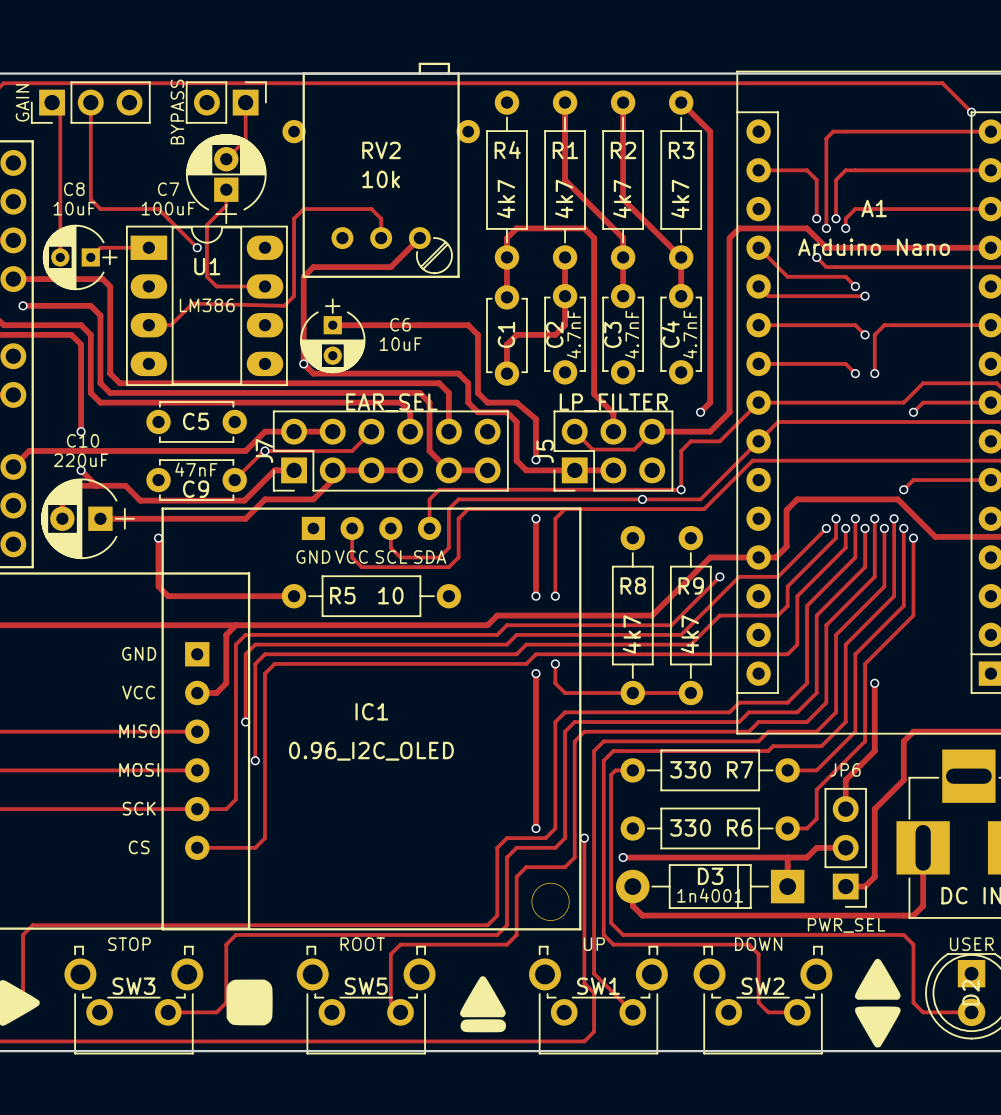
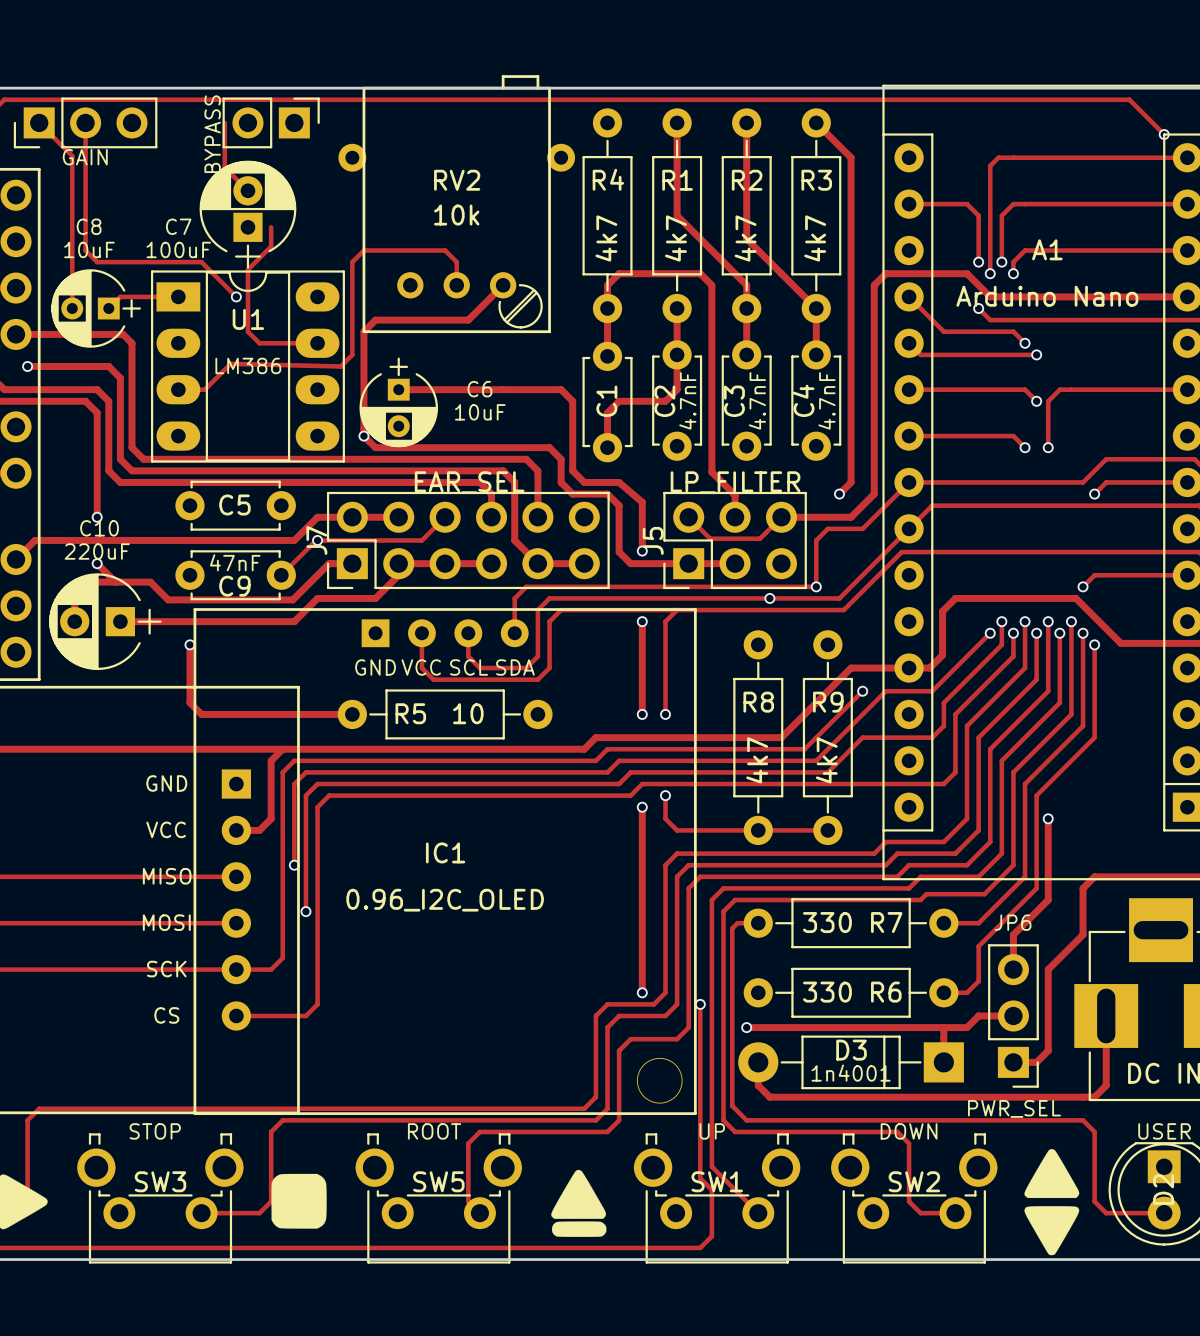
part value rotation: 0° (22, 102) -> 90° clockwise (85, 157)
part value position: GAIN (22, 102) -> GAIN (85, 157)
track: (52, 102) (60, 110) (60, 130) -> (39, 122) (72, 155)
track: (90, 102) (90, 199) (100, 209) (158, 209) (168, 218) -> (85, 122) (85, 250) (97, 262) (201, 262)
part position: (90, 102) -> (85, 122)
track: none -> (224, 122) (224, 167) (247, 190)
track: (245, 102) (245, 139) (226, 159) -> none
C7 position: (226, 179) -> (247, 214)

